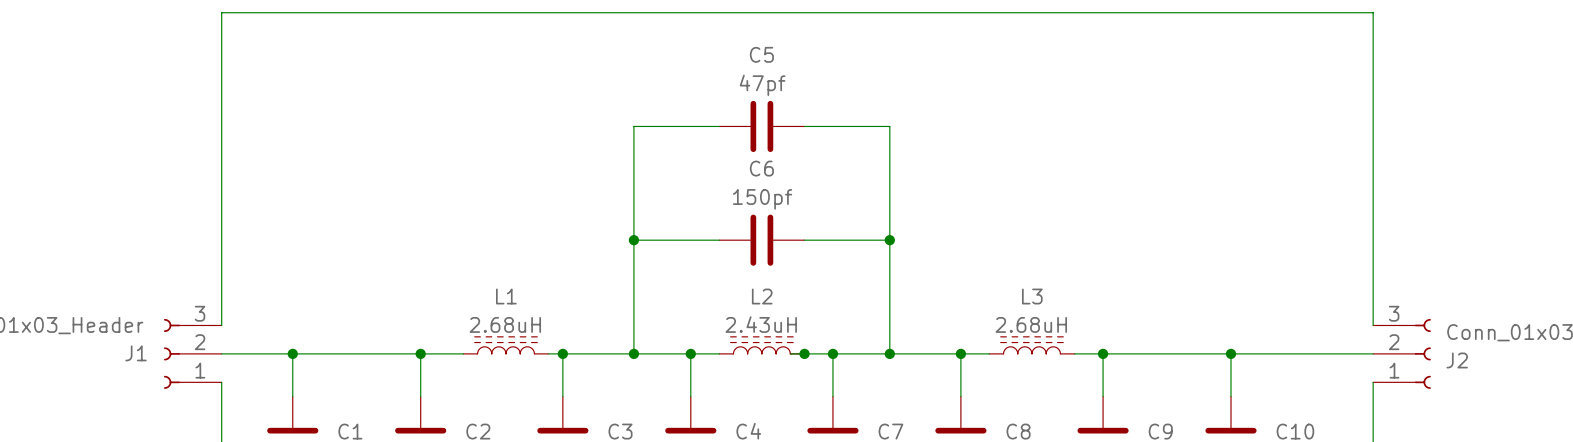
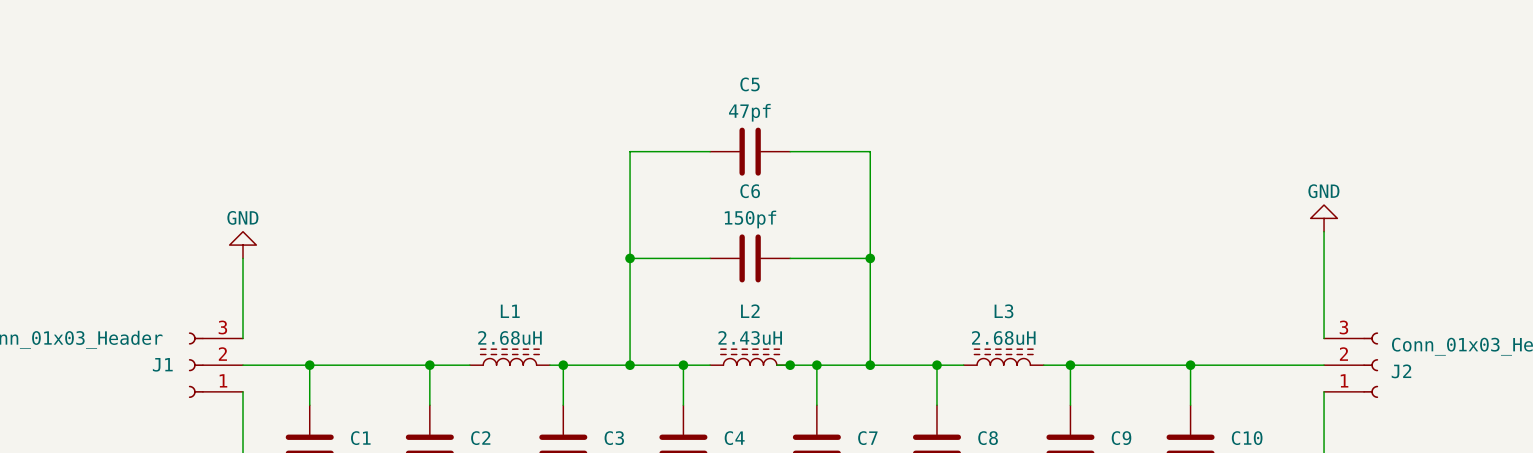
power symbol: none -> GND (1324, 218)
wire: (1373, 211) (1373, 12) (221, 12) (221, 240) -> none
power symbol: none -> GND (243, 245)

